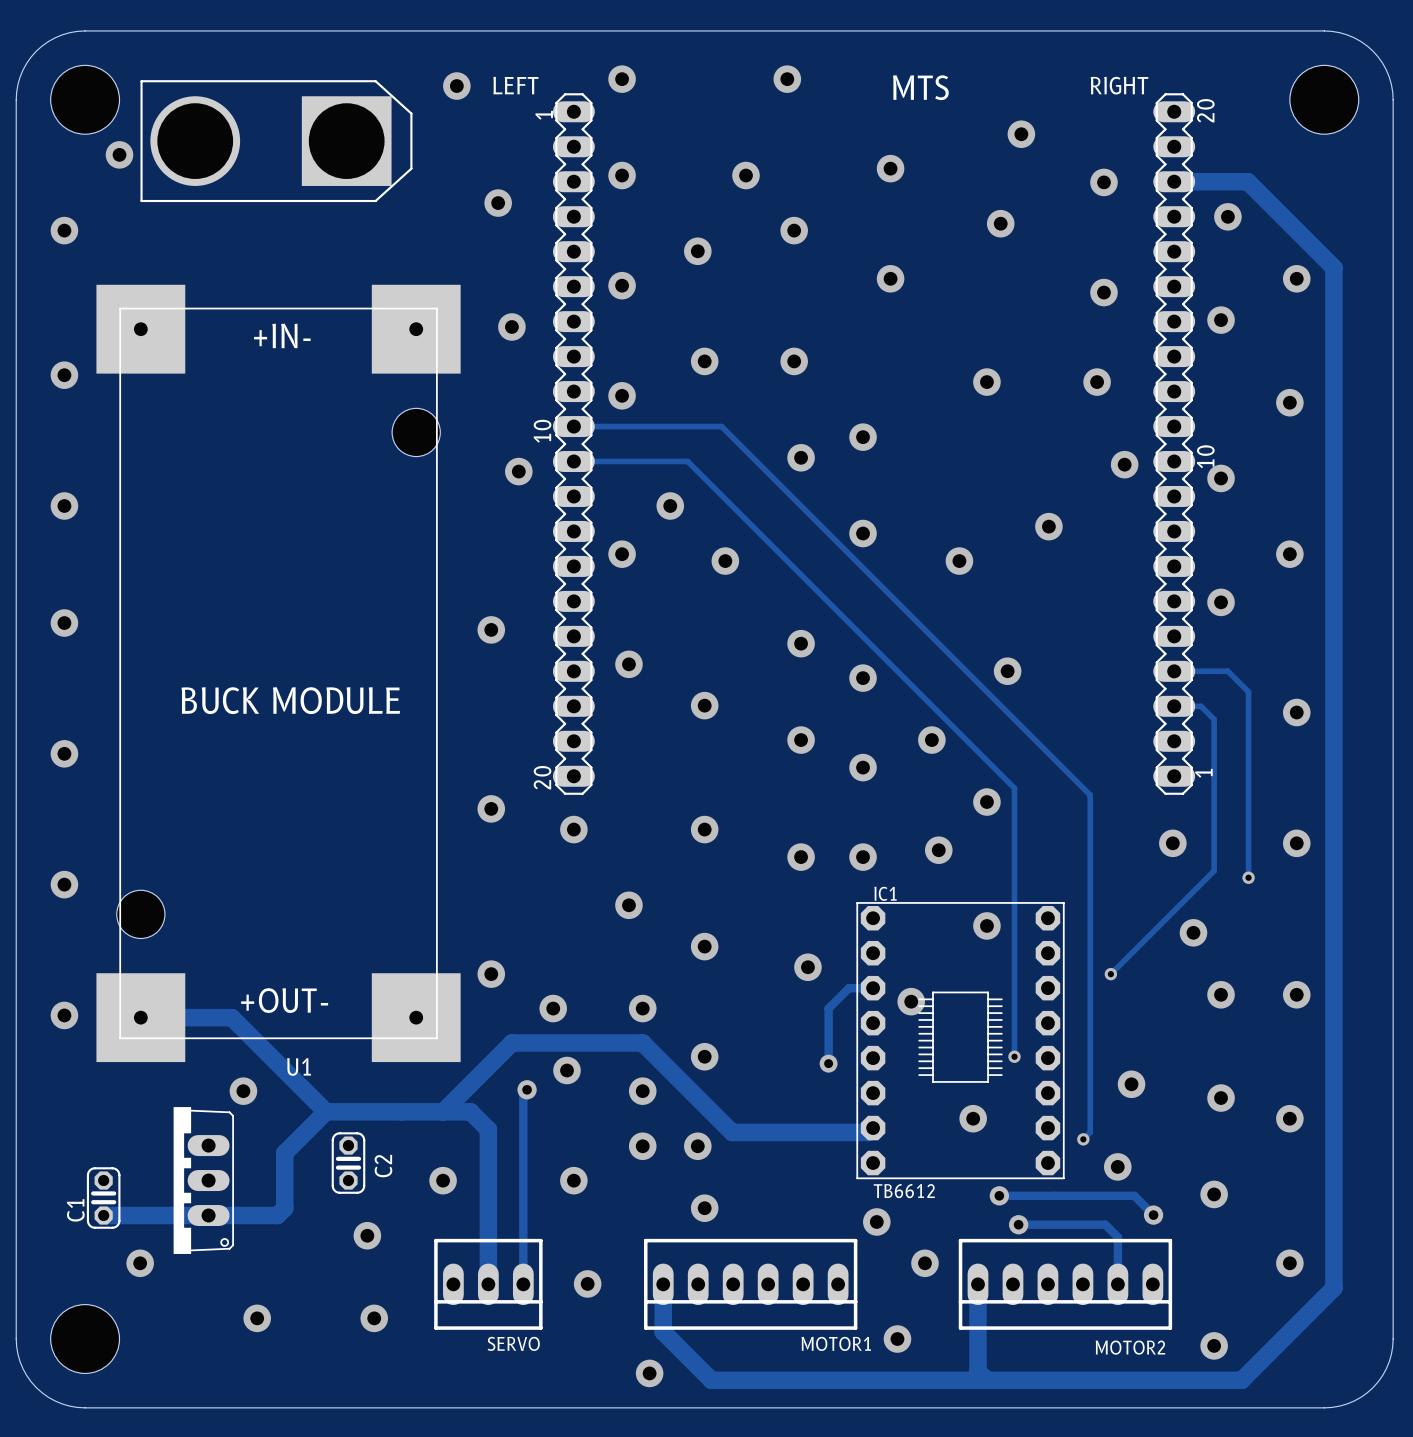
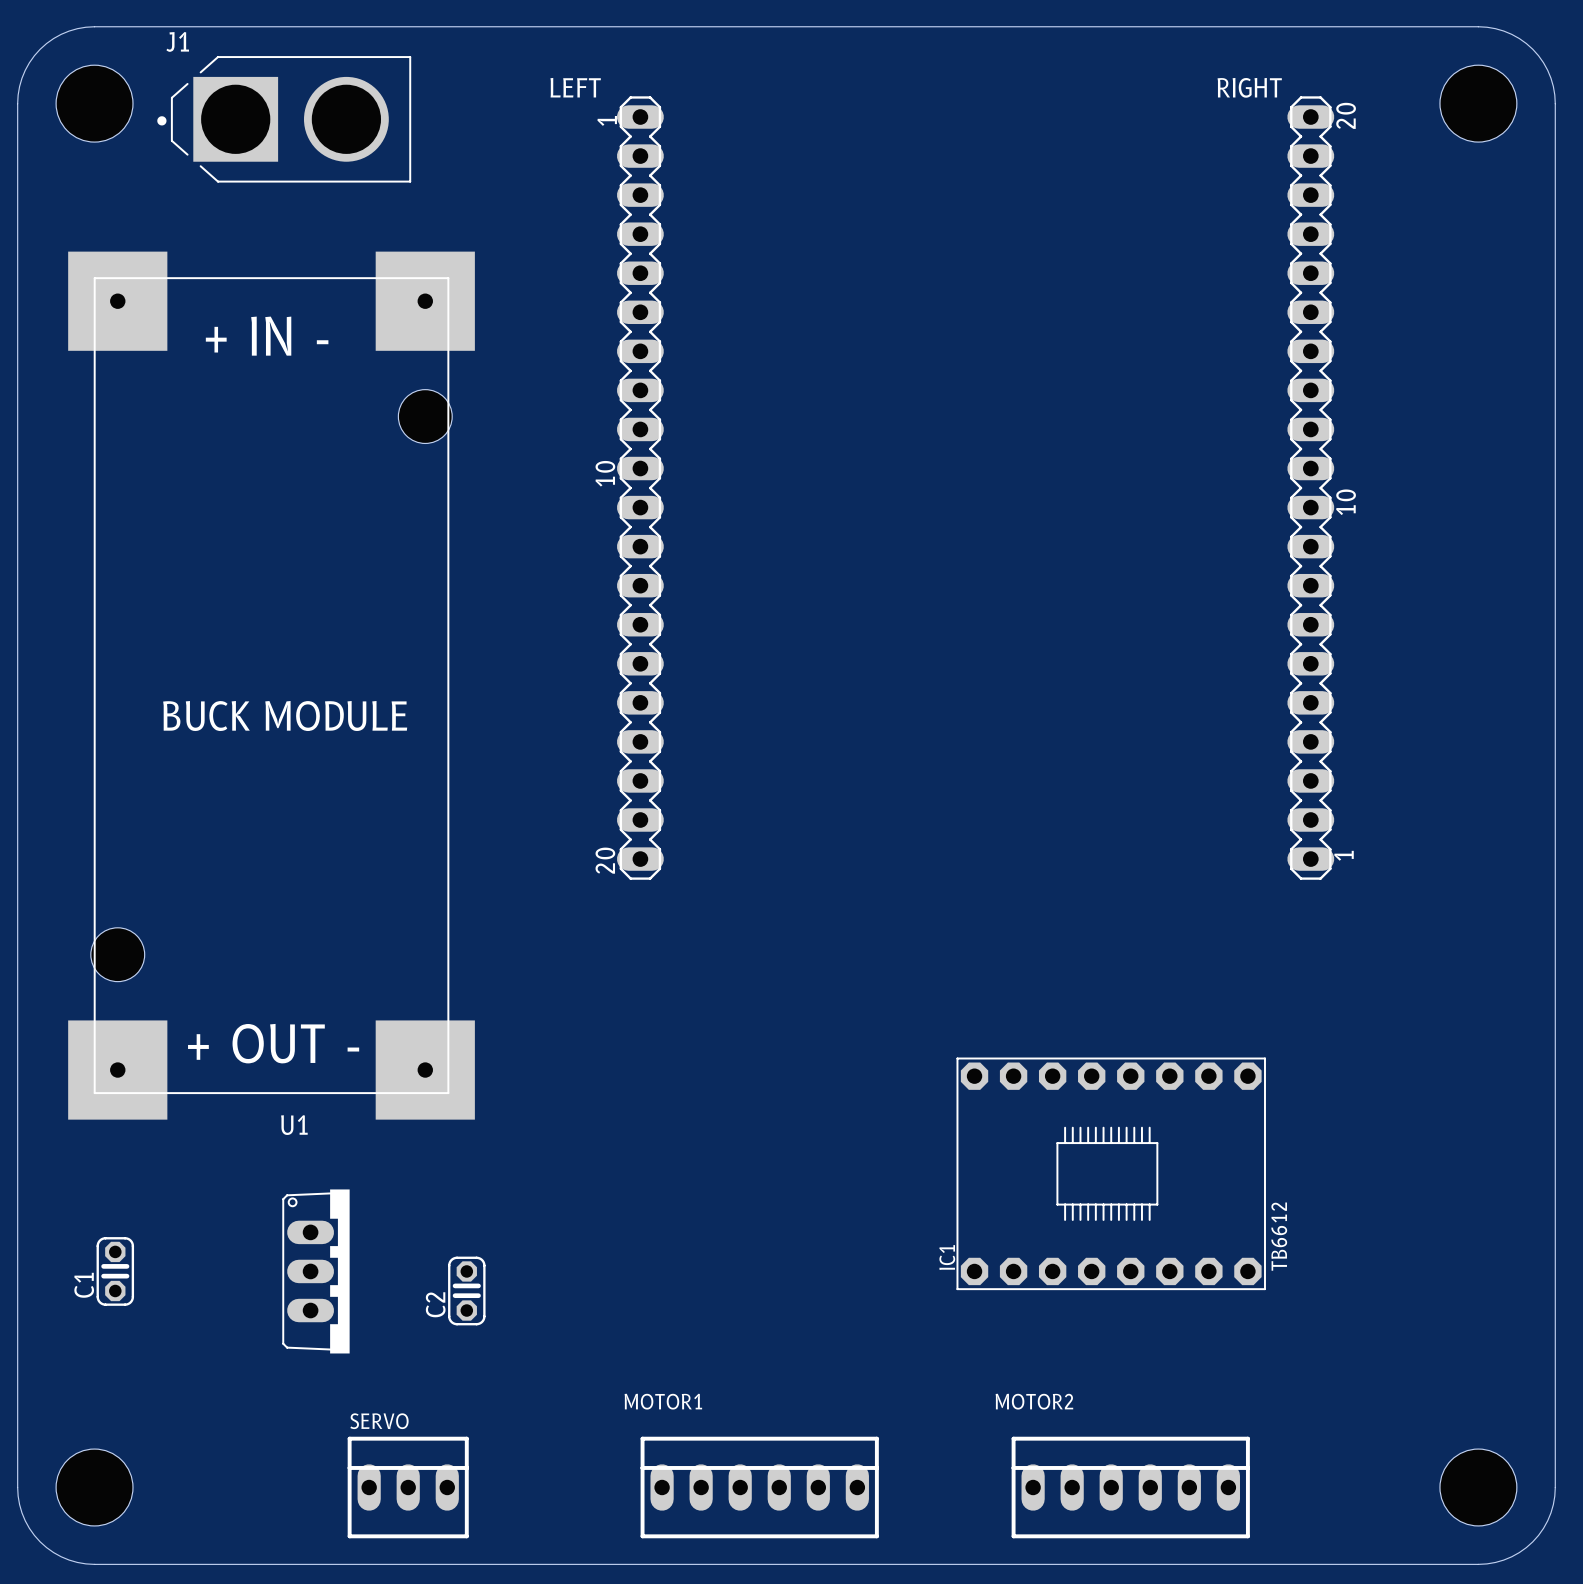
via: (622, 79) -> none
via: (787, 79) -> none
via: (456, 86) -> none
text: MTS (920, 87) -> none
J1: none -> (284, 119)
via: (1021, 134) -> none
part: (276, 141) -> none
via: (119, 154) -> none
via: (890, 168) -> none
via: (622, 175) -> none
via: (746, 175) -> none
track: (1174, 181) (1247, 181) (1333, 267) (1333, 1288) (1241, 1380) (711, 1380) (663, 1331) (663, 1284) -> none
via: (1103, 182) -> none
via: (498, 203) -> none
via: (1227, 216) -> none
via: (1000, 223) -> none
via: (64, 230) -> none
via: (794, 230) -> none
via: (697, 251) -> none
via: (890, 278) -> none
via: (1296, 278) -> none
via: (622, 285) -> none
via: (1103, 292) -> none
U1 text: none -> + IN - (267, 336)
via: (1221, 320) -> none
via: (511, 326) -> none
U1 text: +IN- (282, 335) -> none
via: (704, 361) -> none
via: (794, 361) -> none
via: (64, 375) -> none
via: (986, 382) -> none
via: (1097, 382) -> none
via: (622, 395) -> none
via: (1289, 402) -> none
track: (573, 426) (721, 426) (1090, 795) (1090, 1132) (1083, 1139) -> none
via: (863, 437) -> none
via: (801, 457) -> none
track: (573, 461) (687, 461) (1014, 788) (1014, 1056) -> none
via: (1124, 464) -> none
via: (518, 471) -> none
via: (1221, 478) -> none
via: (64, 505) -> none
via: (670, 505) -> none
via: (1048, 526) -> none
via: (863, 533) -> none
via: (622, 554) -> none
via: (1289, 554) -> none
via: (725, 561) -> none
via: (959, 561) -> none
via: (1221, 602) -> none
via: (64, 623) -> none
via: (491, 629) -> none
via: (801, 643) -> none
via: (628, 664) -> none
via: (1007, 671) -> none
track: (1174, 671) (1227, 671) (1248, 691) (1248, 877) -> none
U1 position: (278, 673) -> (271, 685)
via: (863, 678) -> none
via: (704, 705) -> none
track: (1174, 706) (1201, 706) (1214, 719) (1214, 870) (1110, 974) -> none
via: (1296, 712) -> none
via: (801, 740) -> none
via: (931, 740) -> none
via: (64, 753) -> none
via: (863, 767) -> none
via: (986, 802) -> none
via: (491, 808) -> none
via: (573, 829) -> none
via: (704, 829) -> none
via: (1172, 843) -> none
via: (1296, 843) -> none
via: (938, 850) -> none
via: (801, 857) -> none
via: (863, 857) -> none
via: (1248, 877) -> none
via: (64, 884) -> none
via: (628, 905) -> none
via: (986, 925) -> none
via: (1193, 932) -> none
U1 text: none -> + OUT - (273, 1043)
via: (704, 946) -> none
via: (807, 967) -> none
via: (491, 974) -> none
via: (1110, 974) -> none
track: (873, 988) (848, 988) (828, 1008) (828, 1063) -> none
via: (1221, 994) -> none
via: (1296, 994) -> none
U1 text: +OUT- (284, 1000) -> none
via: (911, 1001) -> none
via: (553, 1008) -> none
via: (642, 1008) -> none
via: (64, 1015) -> none
track: (140, 1017) (231, 1017) (326, 1111) -> none
IC1 rotation: 0° (960, 1040) -> 90° counterclockwise (1111, 1173)
via: (704, 1056) -> none
via: (1014, 1056) -> none
via: (828, 1063) -> none
via: (567, 1070) -> none
via: (1131, 1084) -> none
track: (527, 1089) (523, 1093) (523, 1284) -> none
via: (527, 1089) -> none
via: (243, 1091) -> none
via: (642, 1091) -> none
via: (1221, 1098) -> none
track: (326, 1111) (284, 1153) (284, 1208) (277, 1215) (103, 1215) -> none
track: (326, 1111) (470, 1111) (488, 1129) (488, 1284) -> none
track: (443, 1111) (511, 1042) (642, 1042) (732, 1132) (868, 1132) (873, 1128) -> none
via: (973, 1118) -> none
via: (1289, 1118) -> none
via: (1083, 1139) -> none
via: (642, 1146) -> none
via: (697, 1146) -> none
C2 rotation: 0° (348, 1163) -> 180° (466, 1290)
C2 position: (348, 1163) -> (466, 1290)
via: (1117, 1166) -> none
part rotation: 0° (203, 1180) -> 180° (315, 1271)
via: (443, 1180) -> none
via: (573, 1180) -> none
via: (1214, 1194) -> none
track: (999, 1195) (1134, 1195) (1153, 1215) -> none
via: (999, 1195) -> none
C1 position: (103, 1198) -> (115, 1271)
via: (704, 1208) -> none
via: (1153, 1215) -> none
via: (876, 1221) -> none
track: (1018, 1224) (1105, 1224) (1117, 1237) (1117, 1284) -> none
via: (1018, 1224) -> none
via: (367, 1235) -> none
via: (140, 1263) -> none
via: (924, 1263) -> none
via: (1289, 1263) -> none
via: (587, 1283) -> none
SERVO rotation: 0° (488, 1284) -> 180° (408, 1487)
SERVO position: (488, 1284) -> (408, 1487)
MOTOR1 rotation: 0° (750, 1284) -> 180° (759, 1487)
track: (978, 1284) (978, 1371) (986, 1380) -> none
MOTOR2 rotation: 0° (1065, 1284) -> 180° (1130, 1487)
via: (257, 1318) -> none
via: (374, 1318) -> none
via: (897, 1339) -> none
hole: none -> (1478, 1487)
via: (1214, 1345) -> none
via: (649, 1373) -> none

